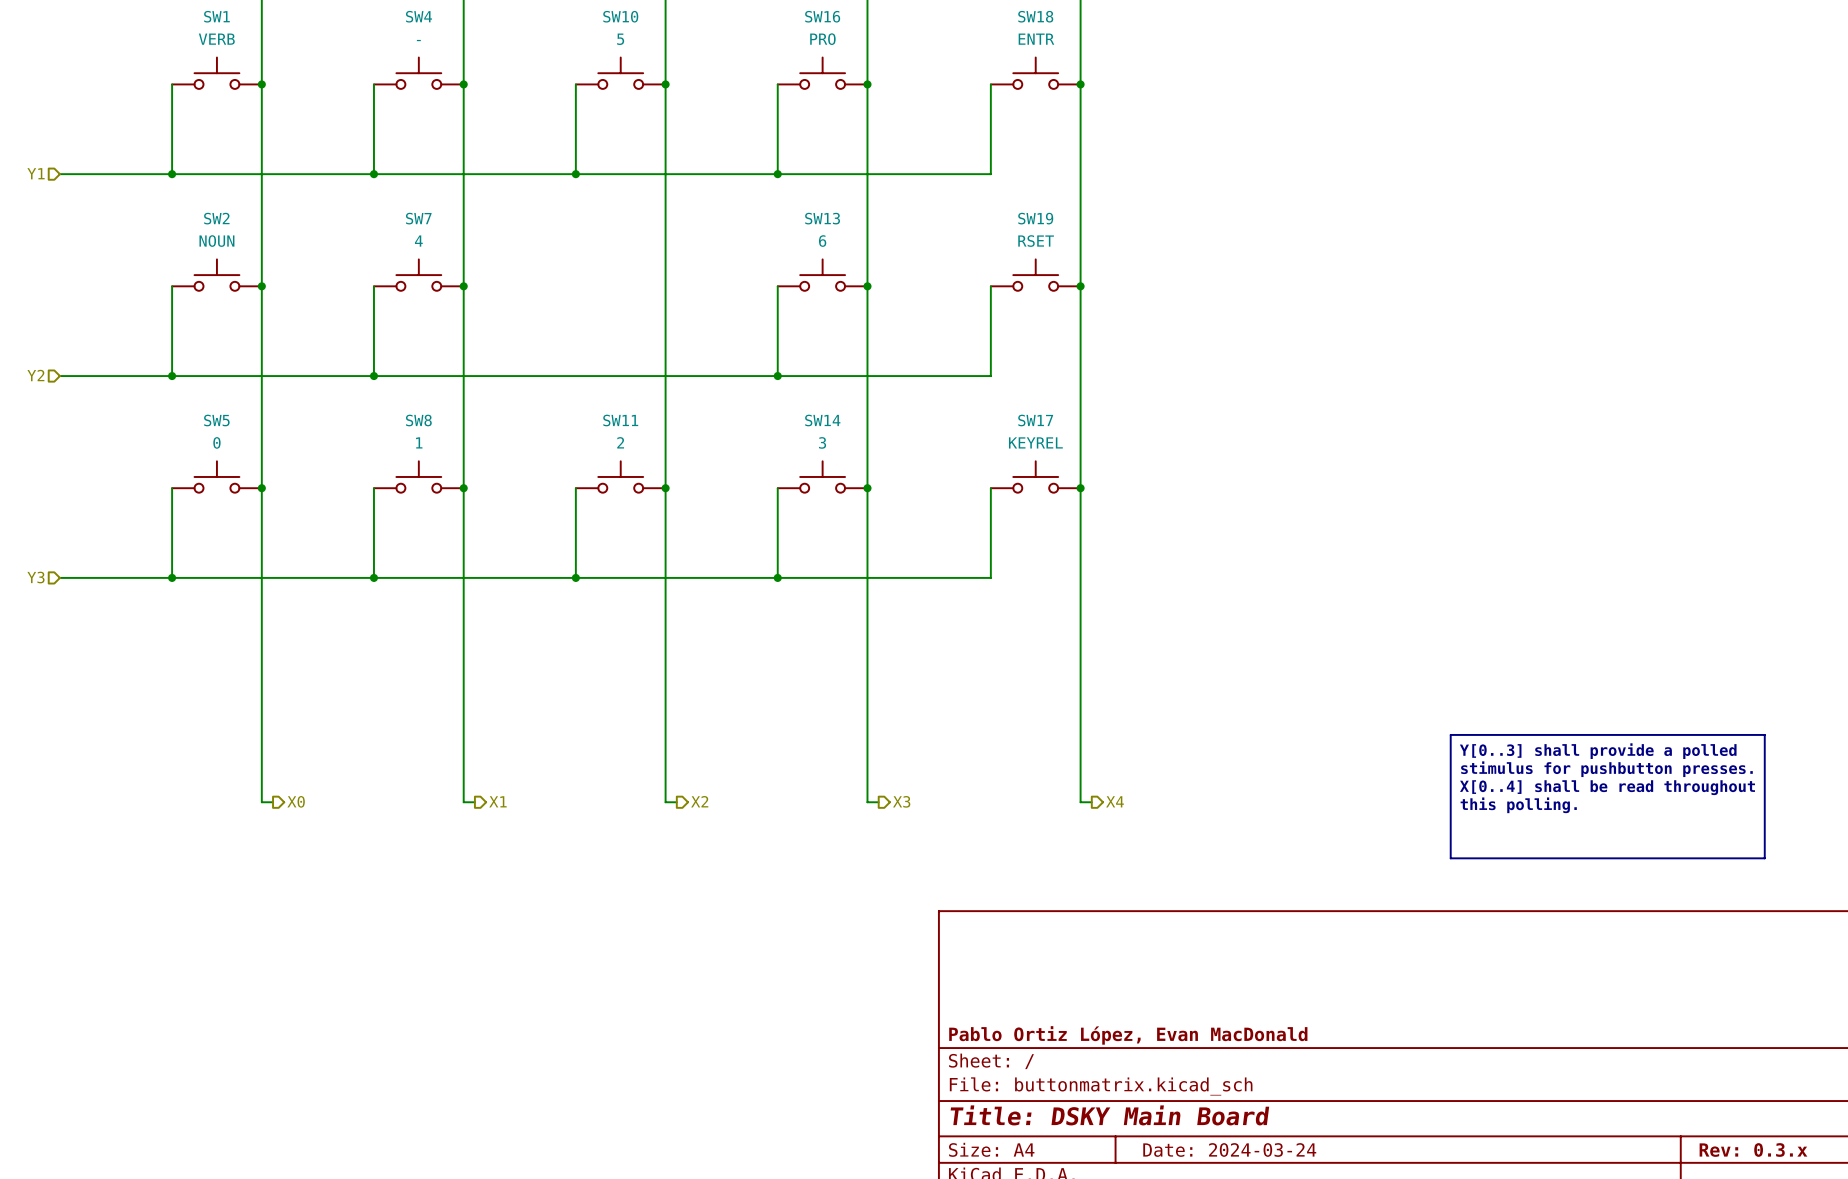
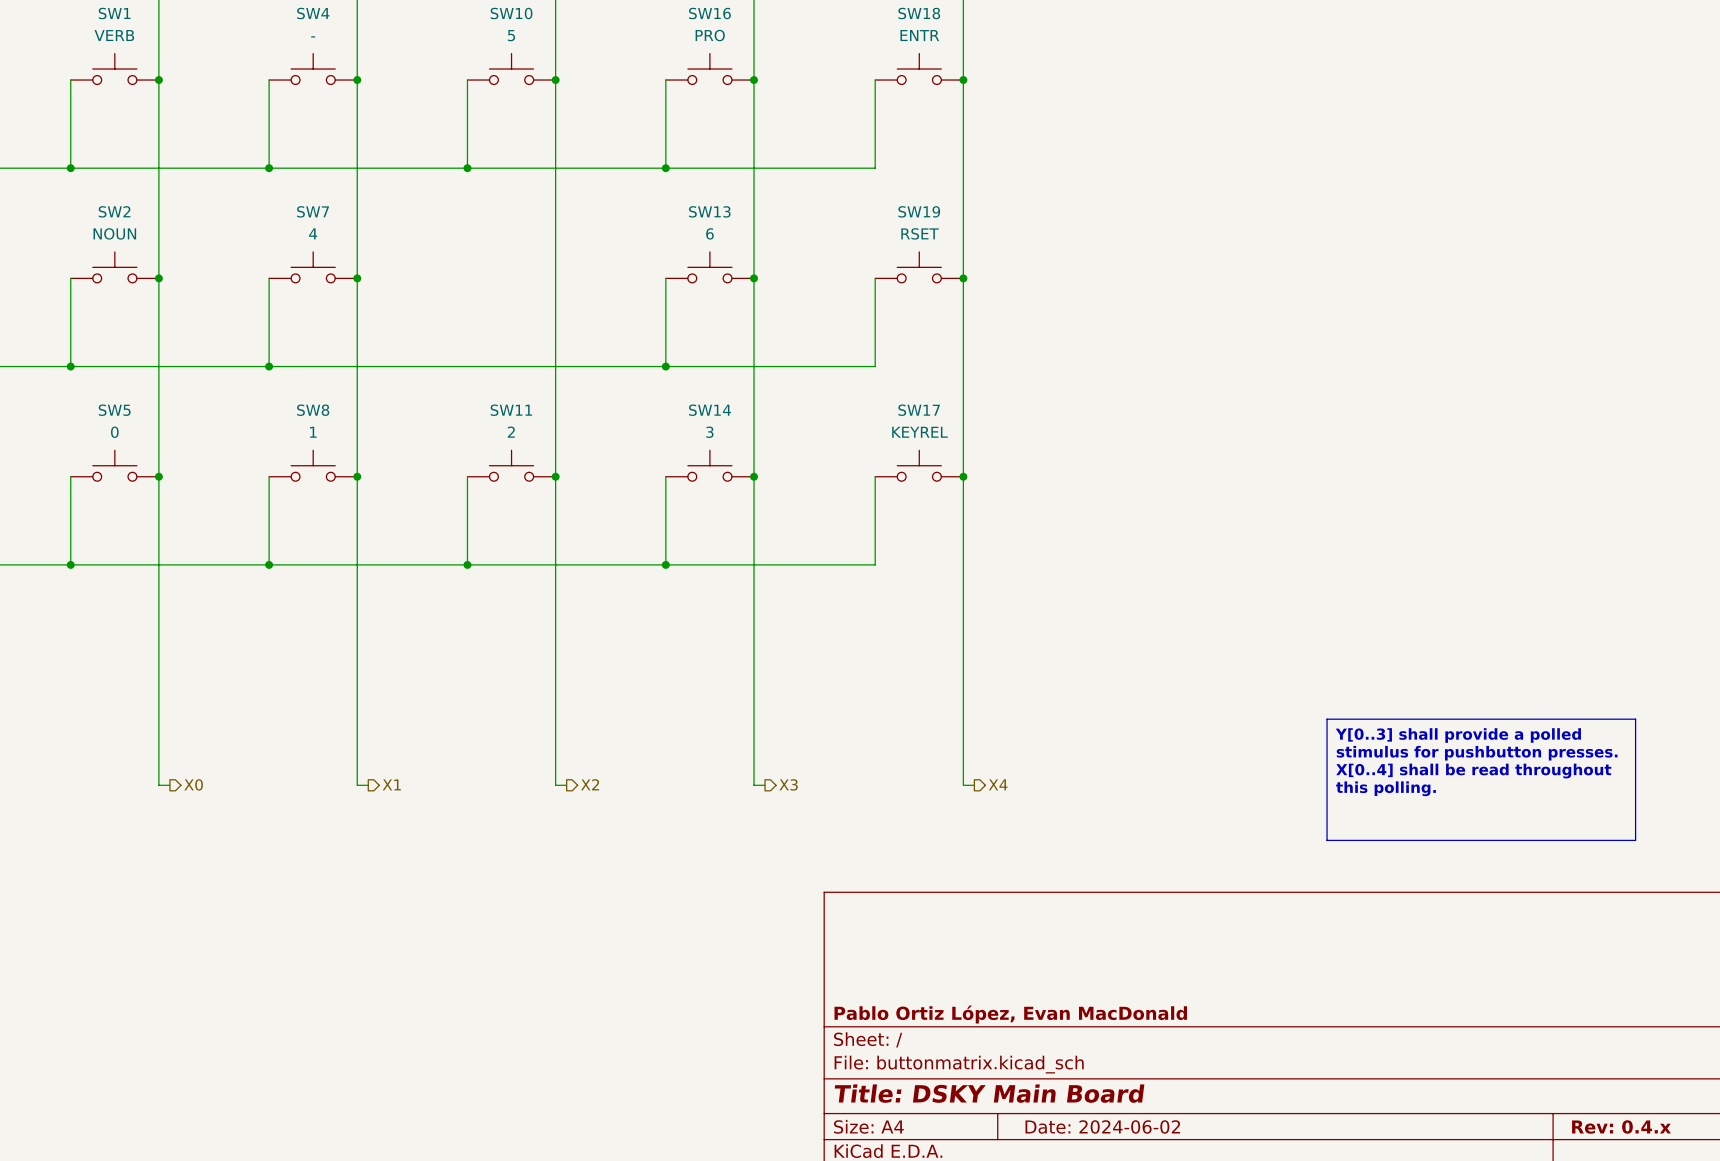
title block: Date: 2024-03-24 (1229, 1149) -> Date: 2024-06-02 (1102, 1126)
title block: Rev: 0.3.x (1753, 1149) -> Rev: 0.4.x (1621, 1126)

